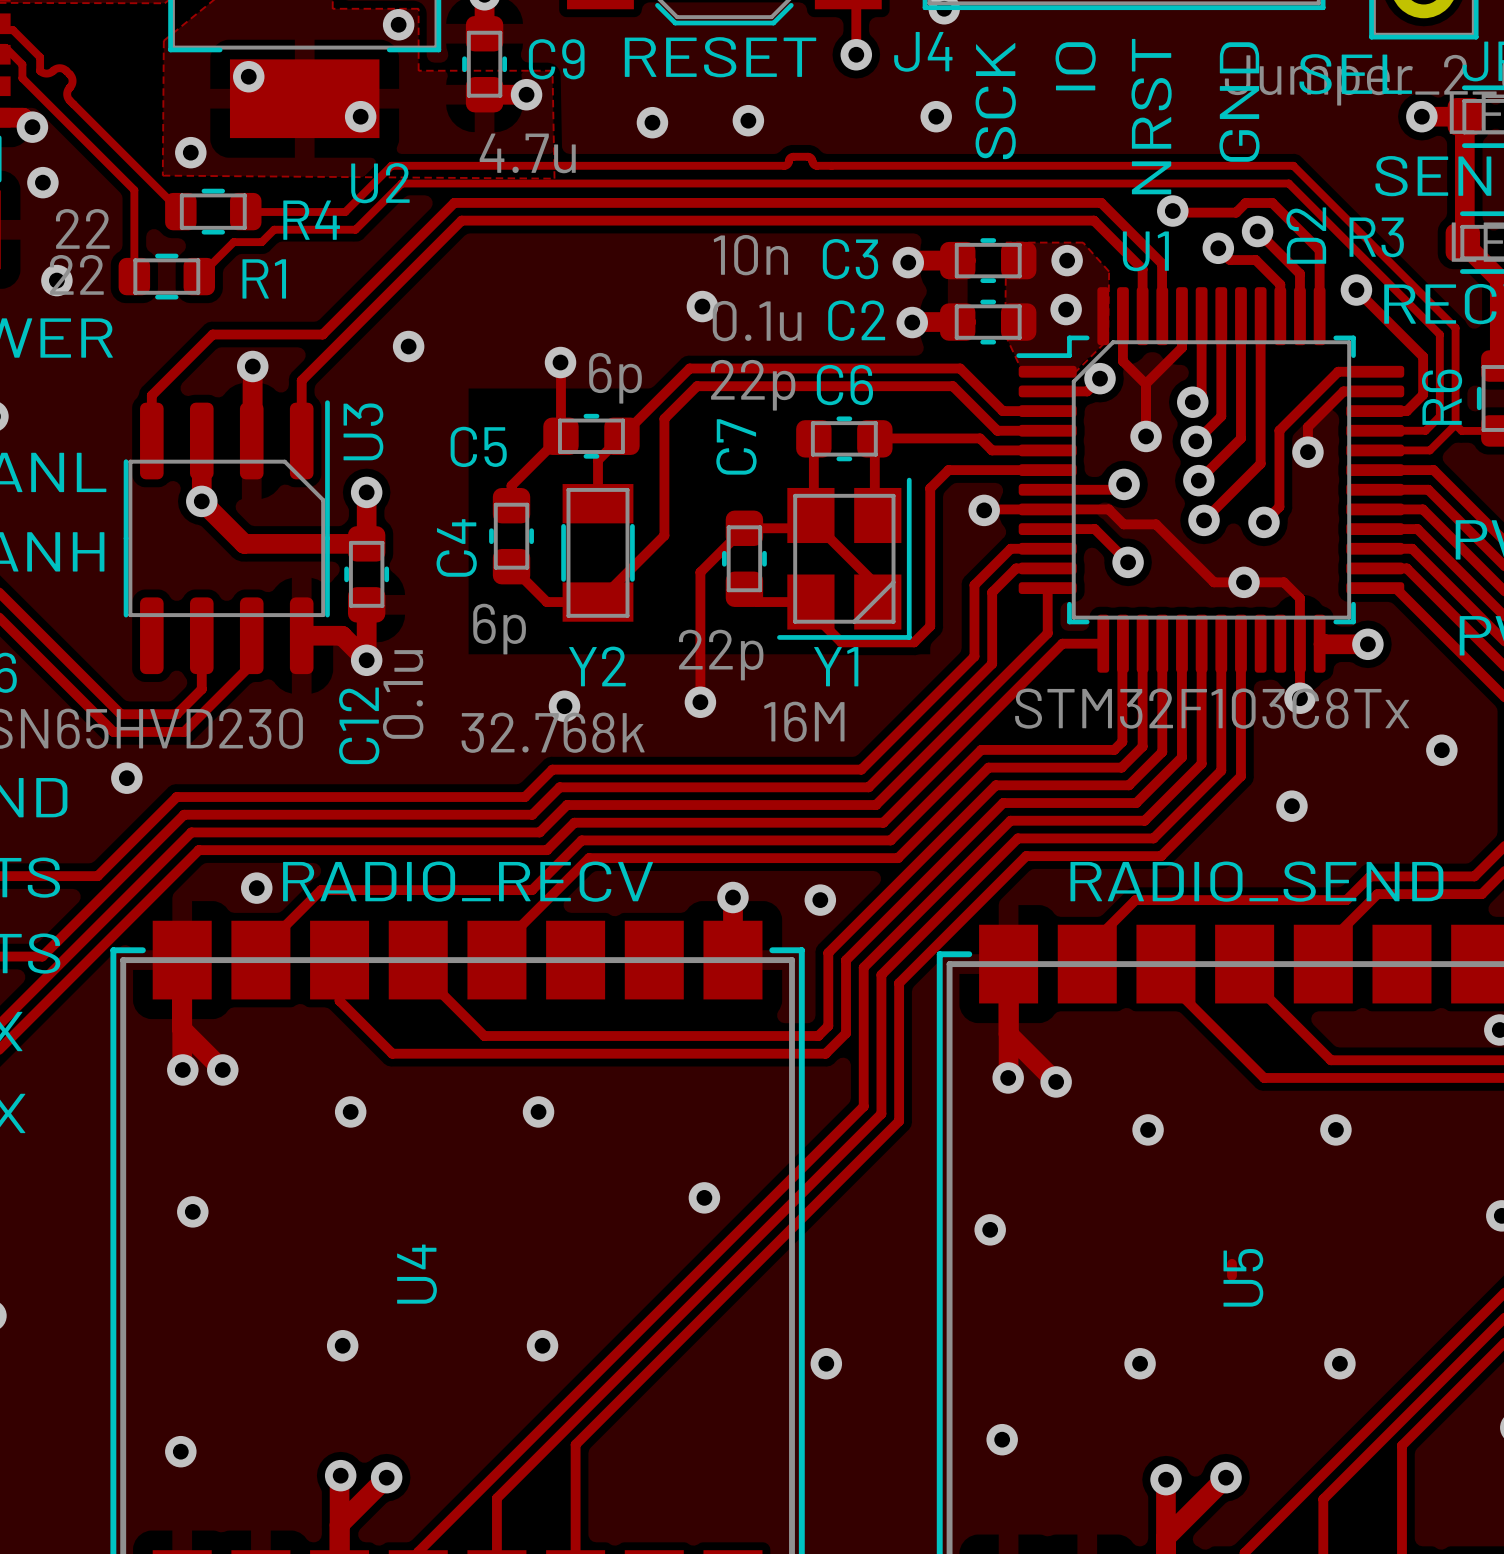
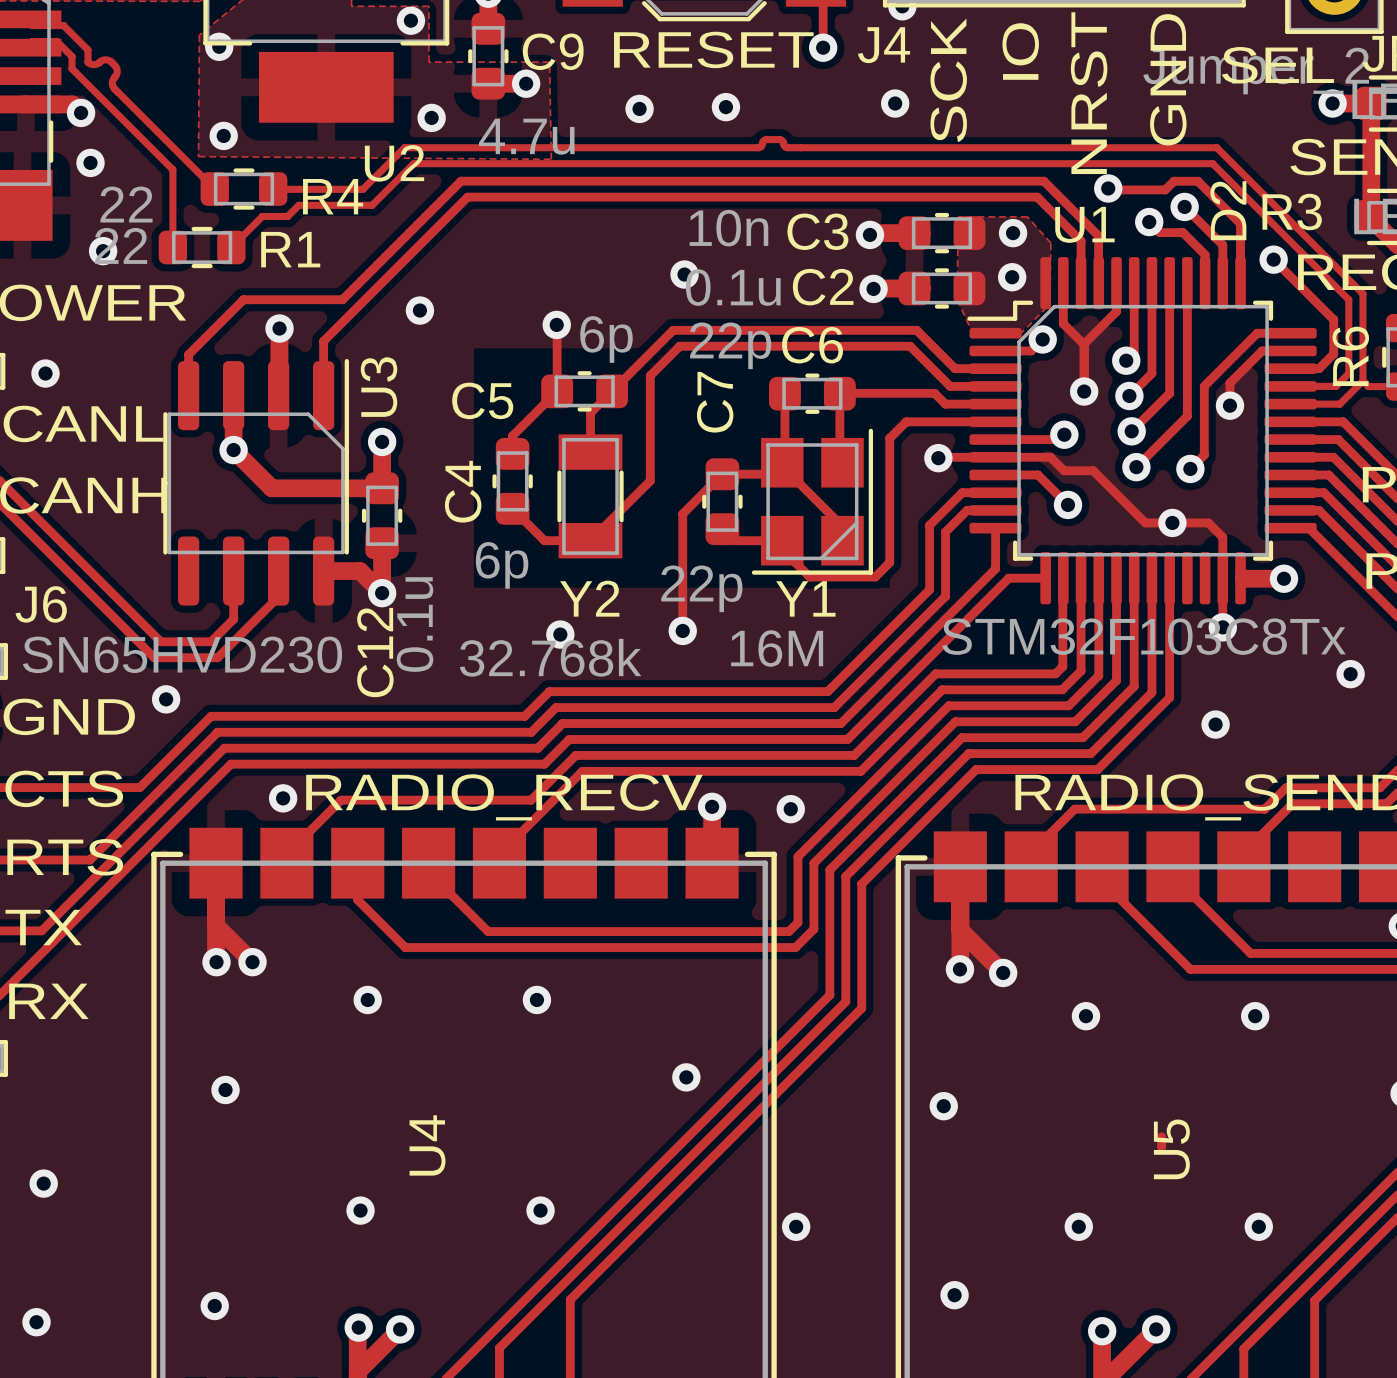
via position: (248, 76) -> (219, 46)
via position: (360, 116) -> (431, 117)

